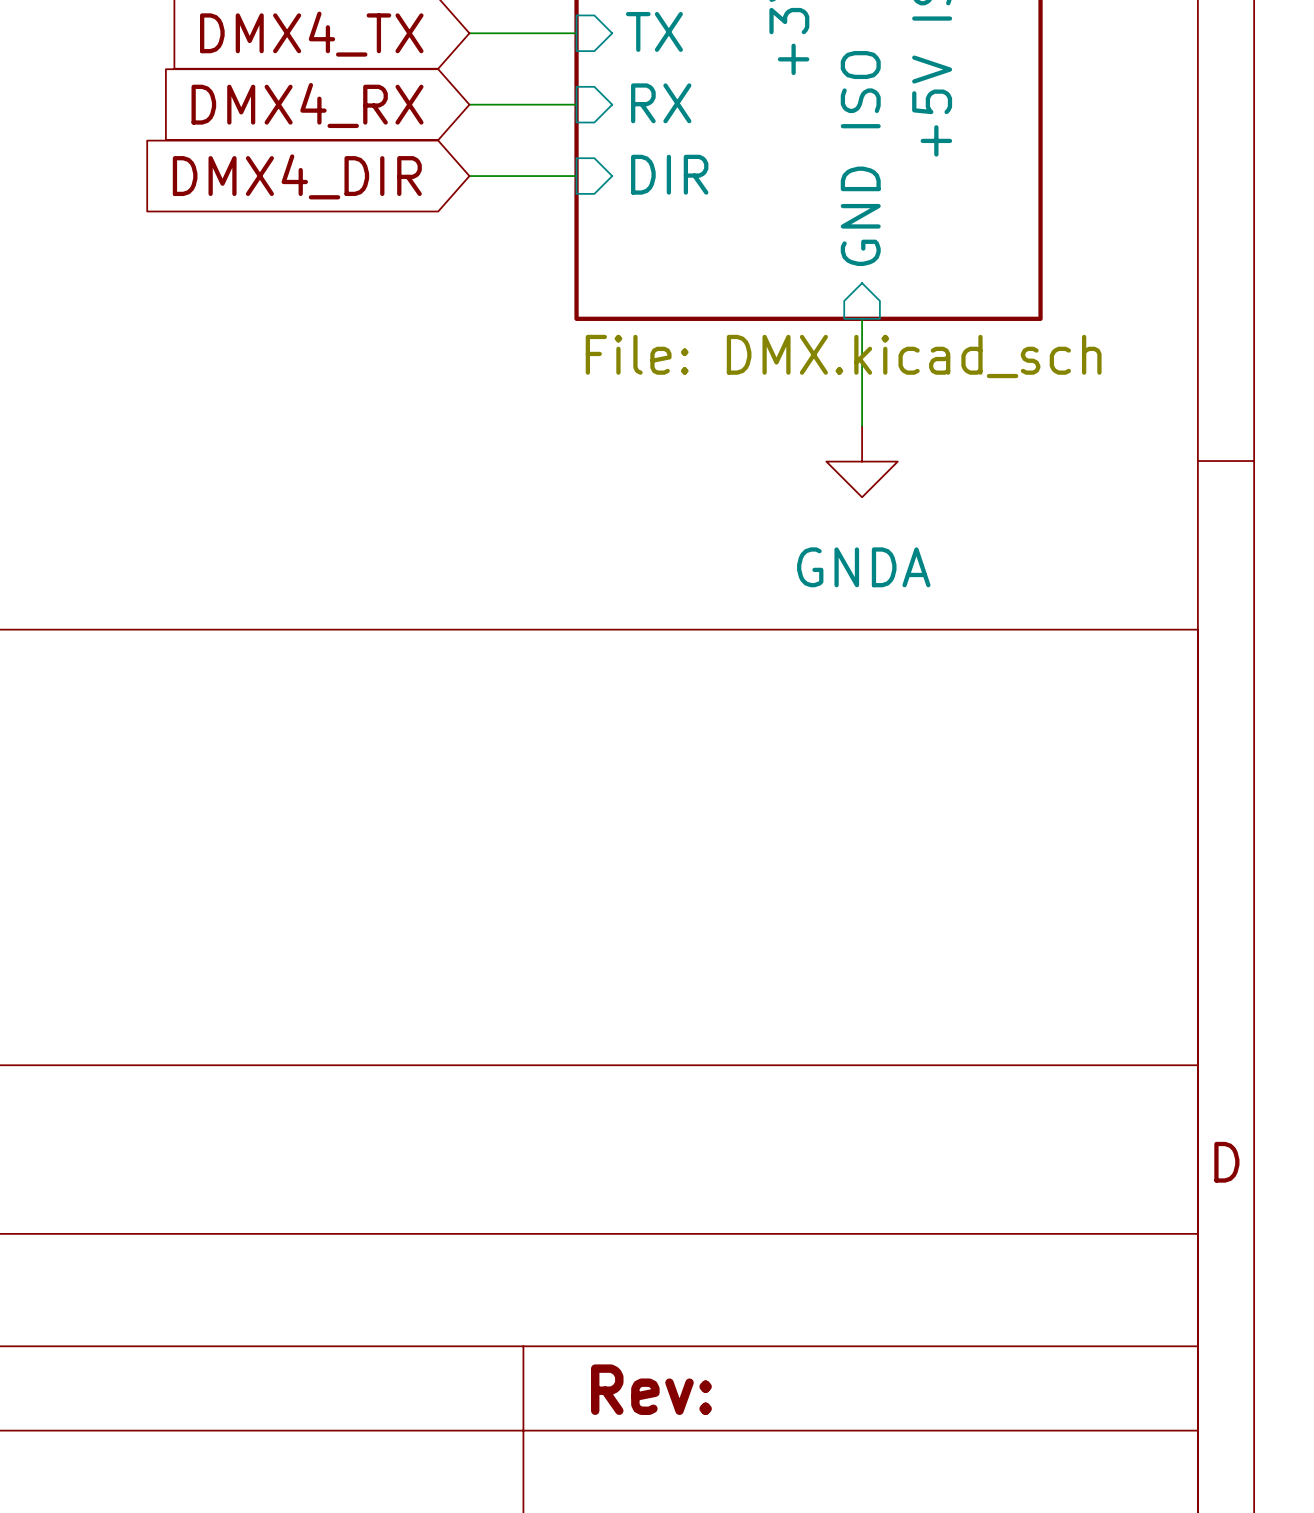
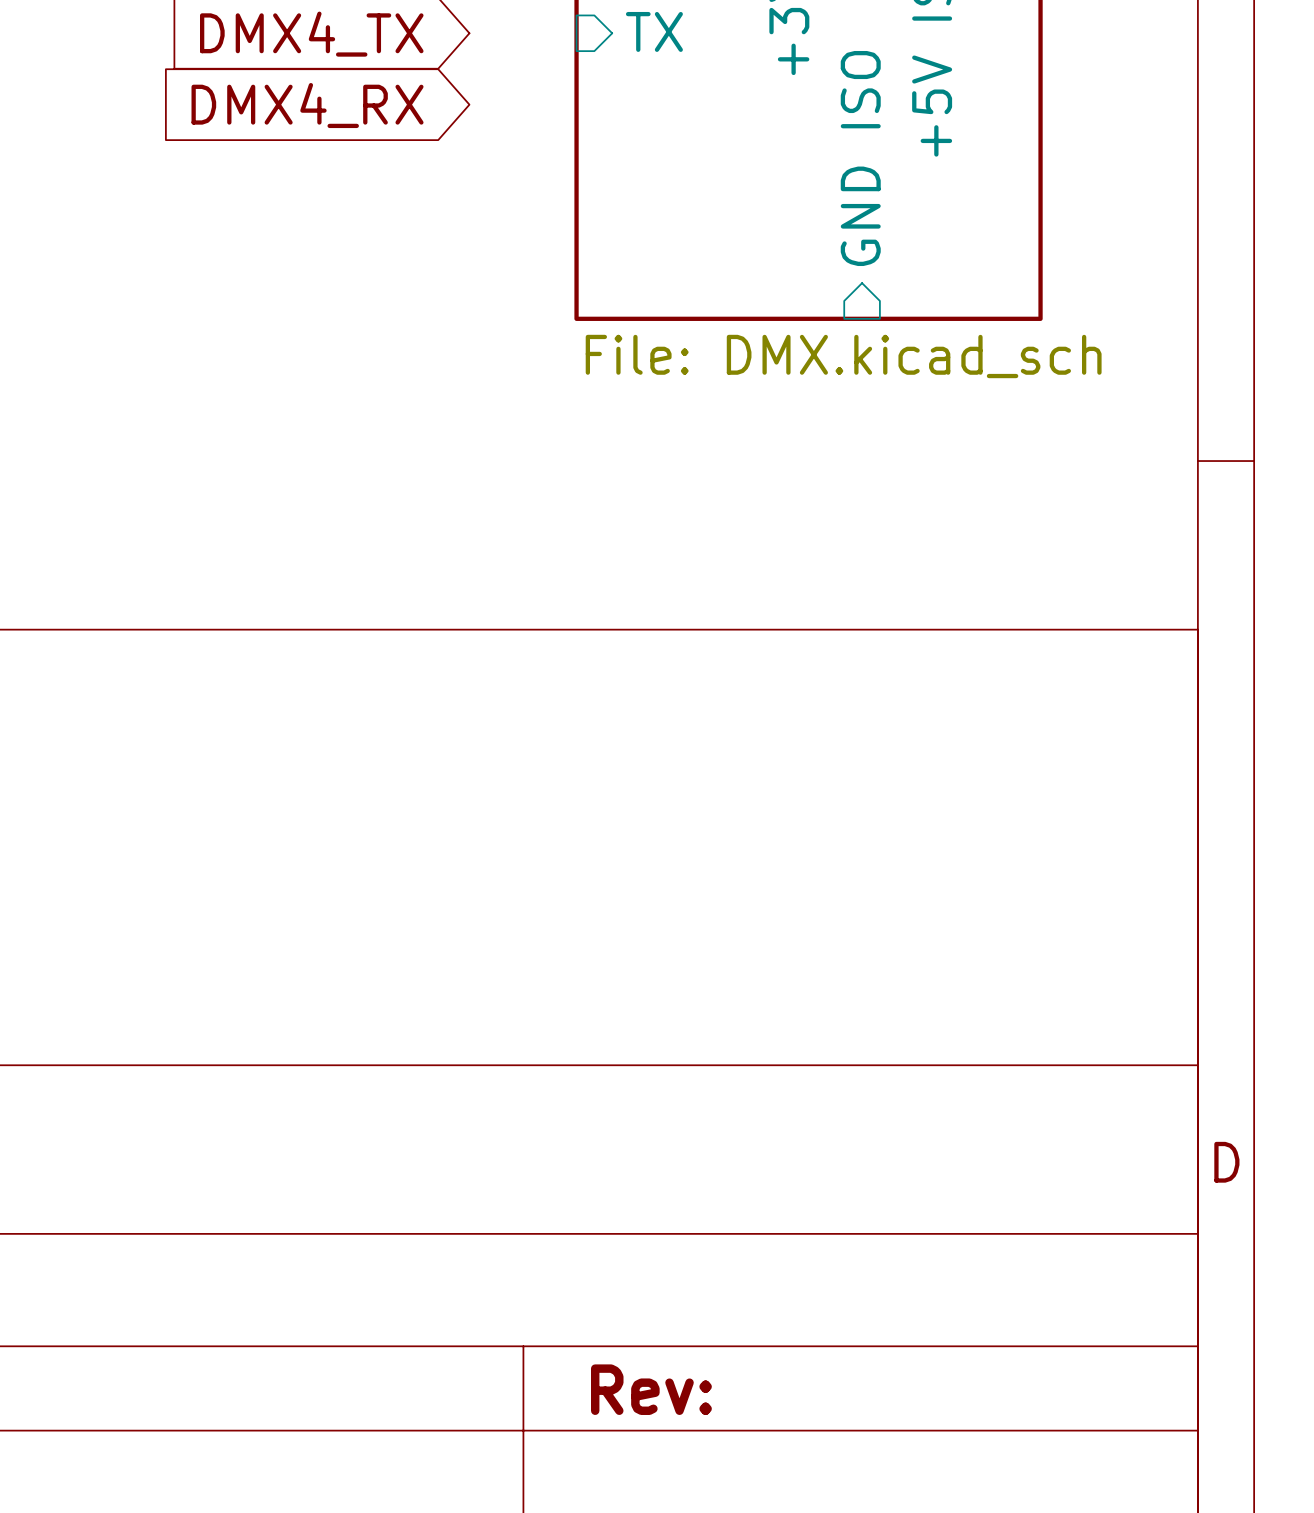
wire: (469, 33) (576, 33) -> none
sheet pin: RX (661, 103) -> none
wire: (469, 104) (576, 104) -> none
sheet pin: DIR (669, 174) -> none
global label: DMX4_DIR (297, 176) -> none
wire: (469, 176) (576, 176) -> none
wire: (862, 318) (862, 425) -> none
power symbol: GNDA (862, 461) -> none

